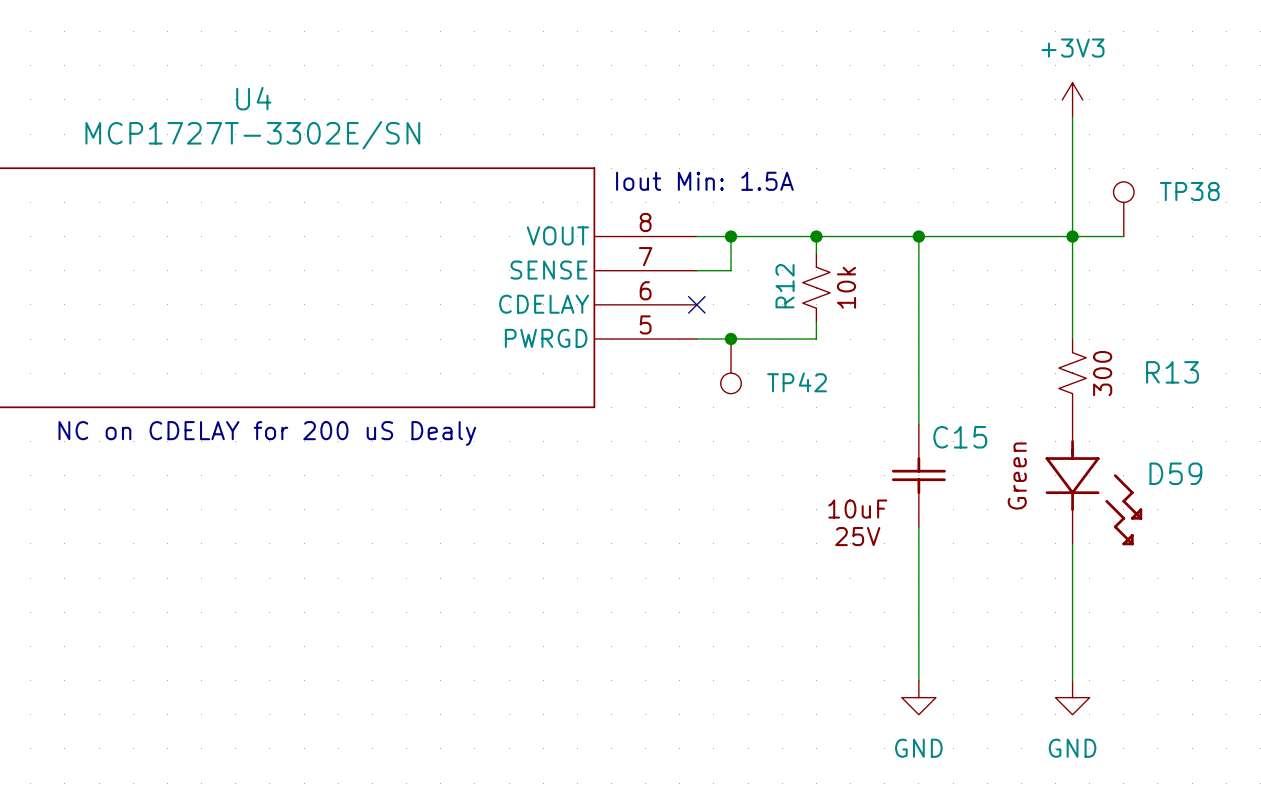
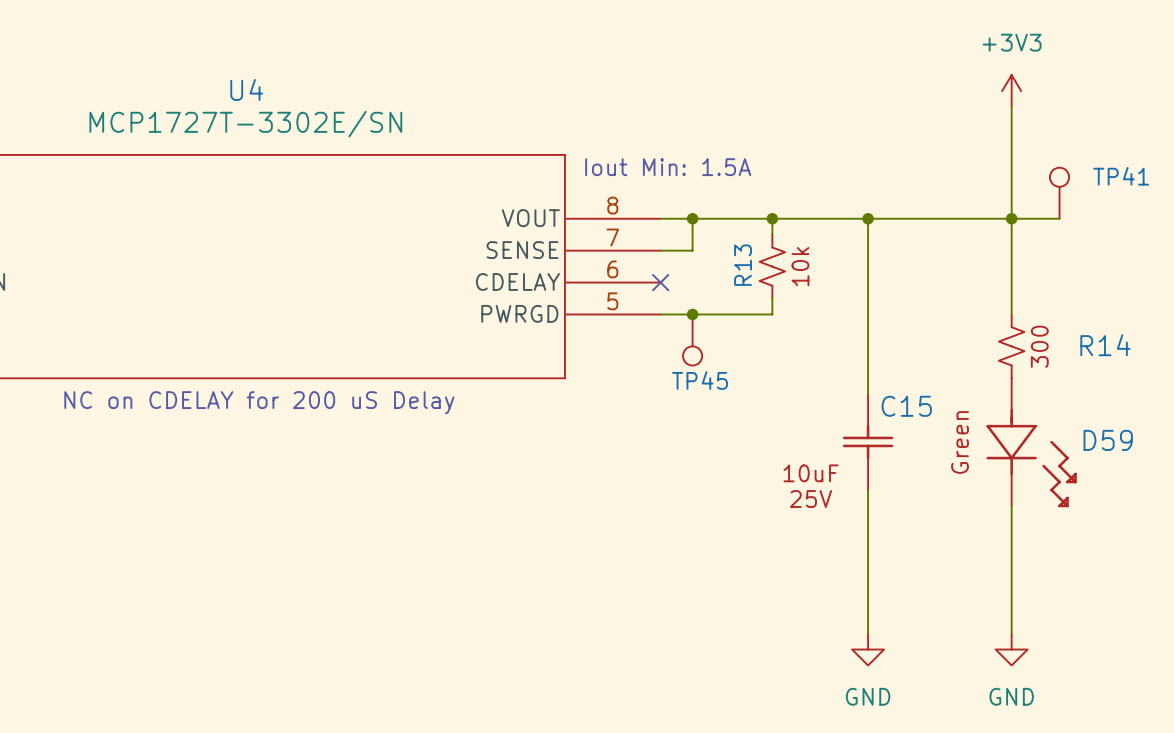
TP38 name: TP38 (1189, 191) -> TP41 (1121, 176)
R12 name: R12 (785, 286) -> R13 (743, 265)
R13 name: R13 (1172, 372) -> R14 (1105, 345)
TP42 name: TP42 (797, 382) -> TP45 (699, 380)
text: NC on CDELAY for 200 uS Dealy (267, 433) -> NC on CDELAY for 200 uS Delay (259, 402)

